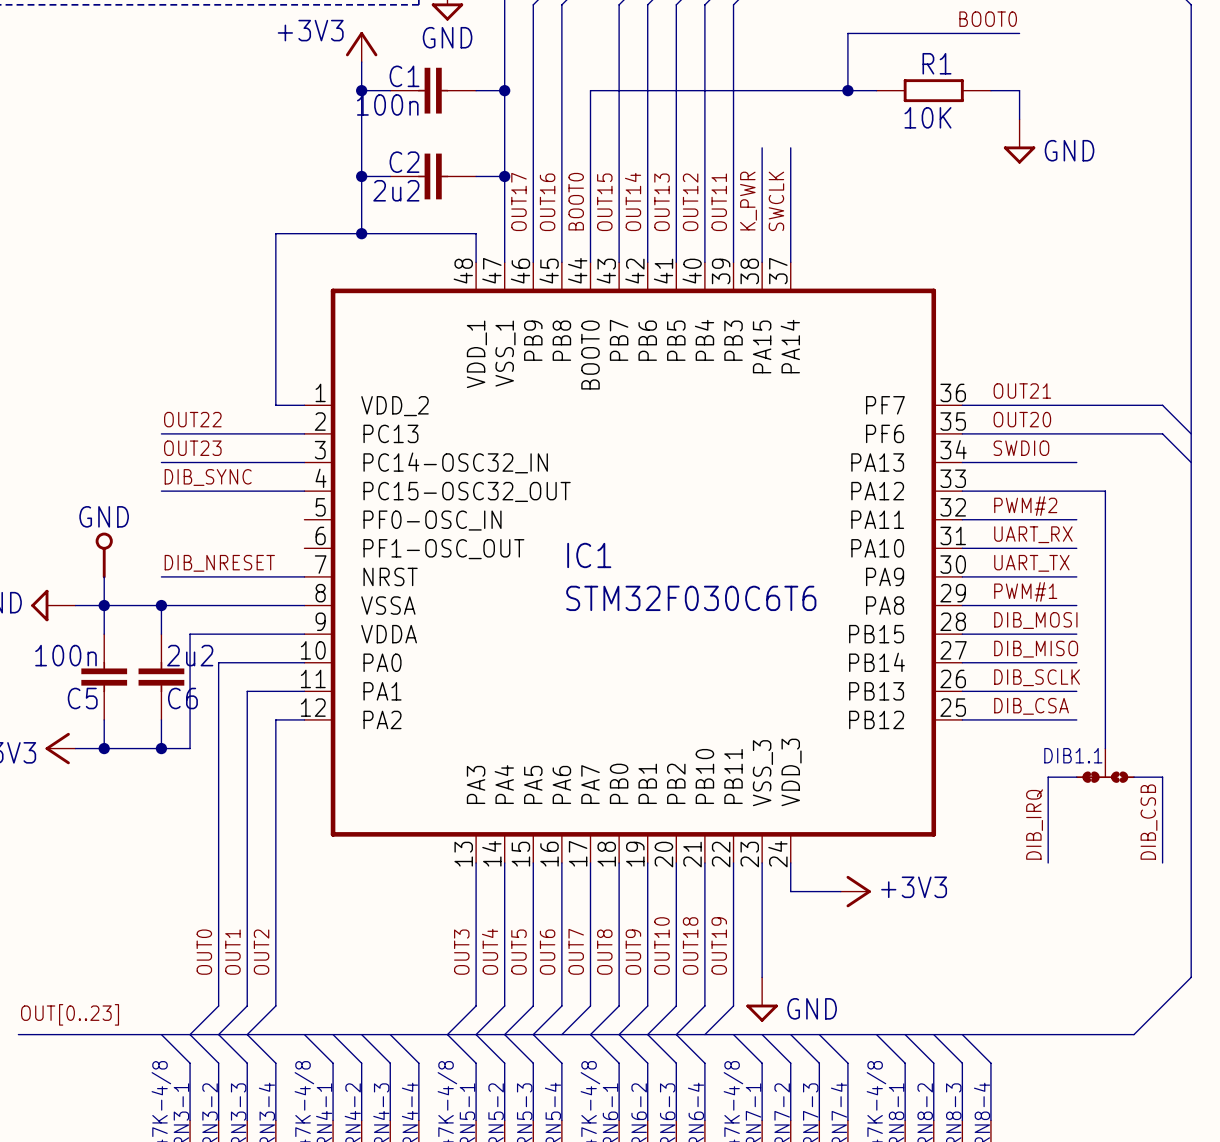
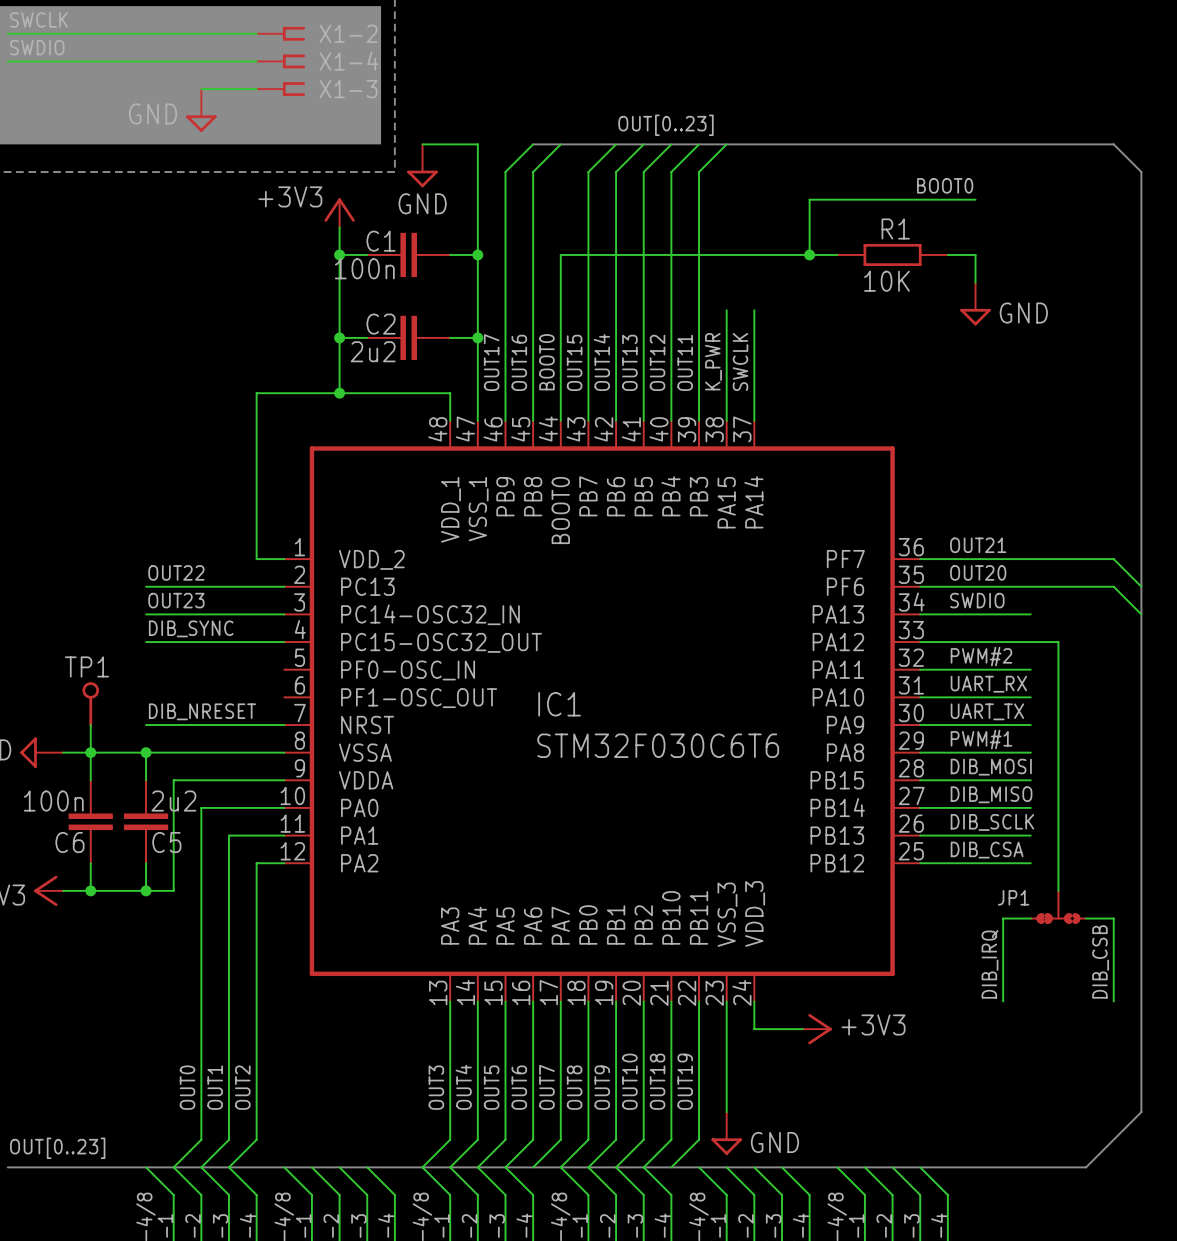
GND name: GND (104, 516) -> TP1 (86, 666)
C5 name: C5 (82, 698) -> C6 (69, 842)
C6 name: C6 (182, 698) -> C5 (166, 842)
DIB1.1 name: DIB1.1 (1073, 755) -> JP1 (1013, 897)

